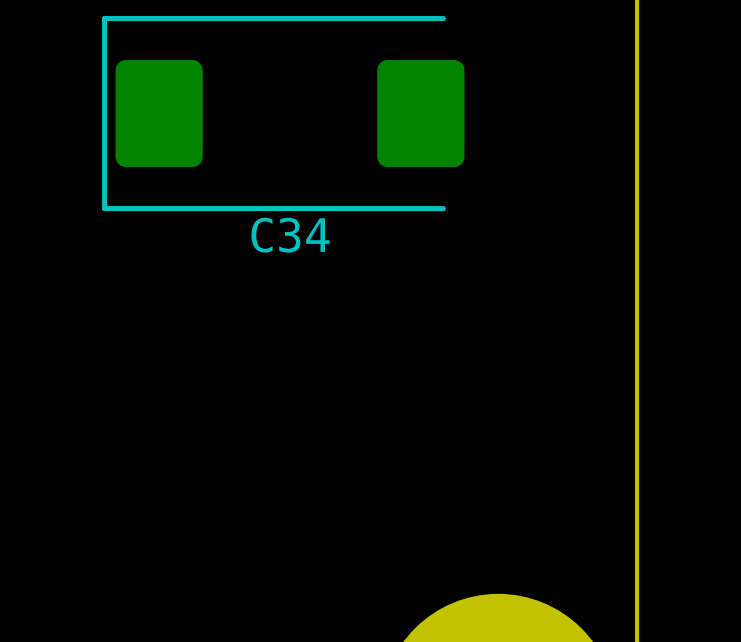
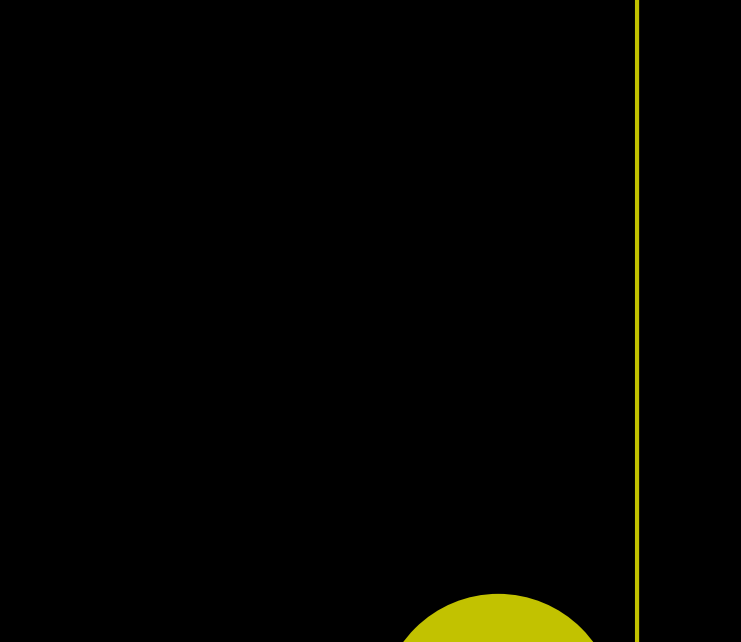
C34: (283, 113) -> none

